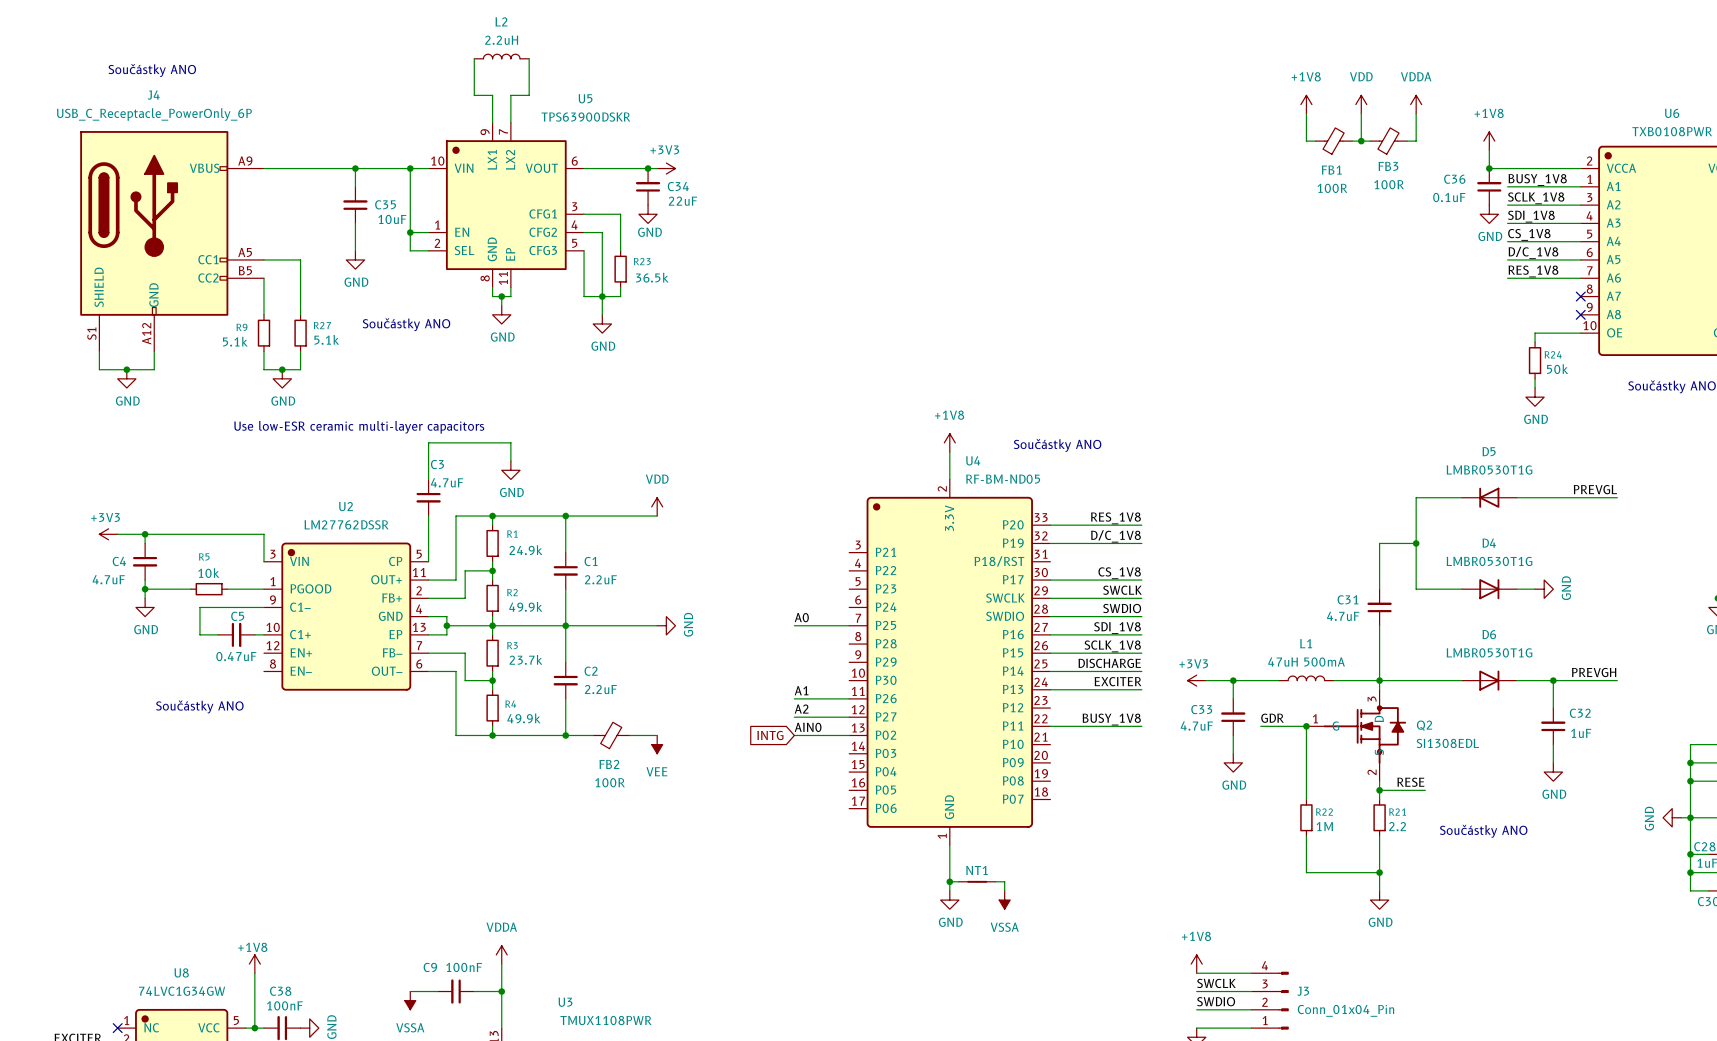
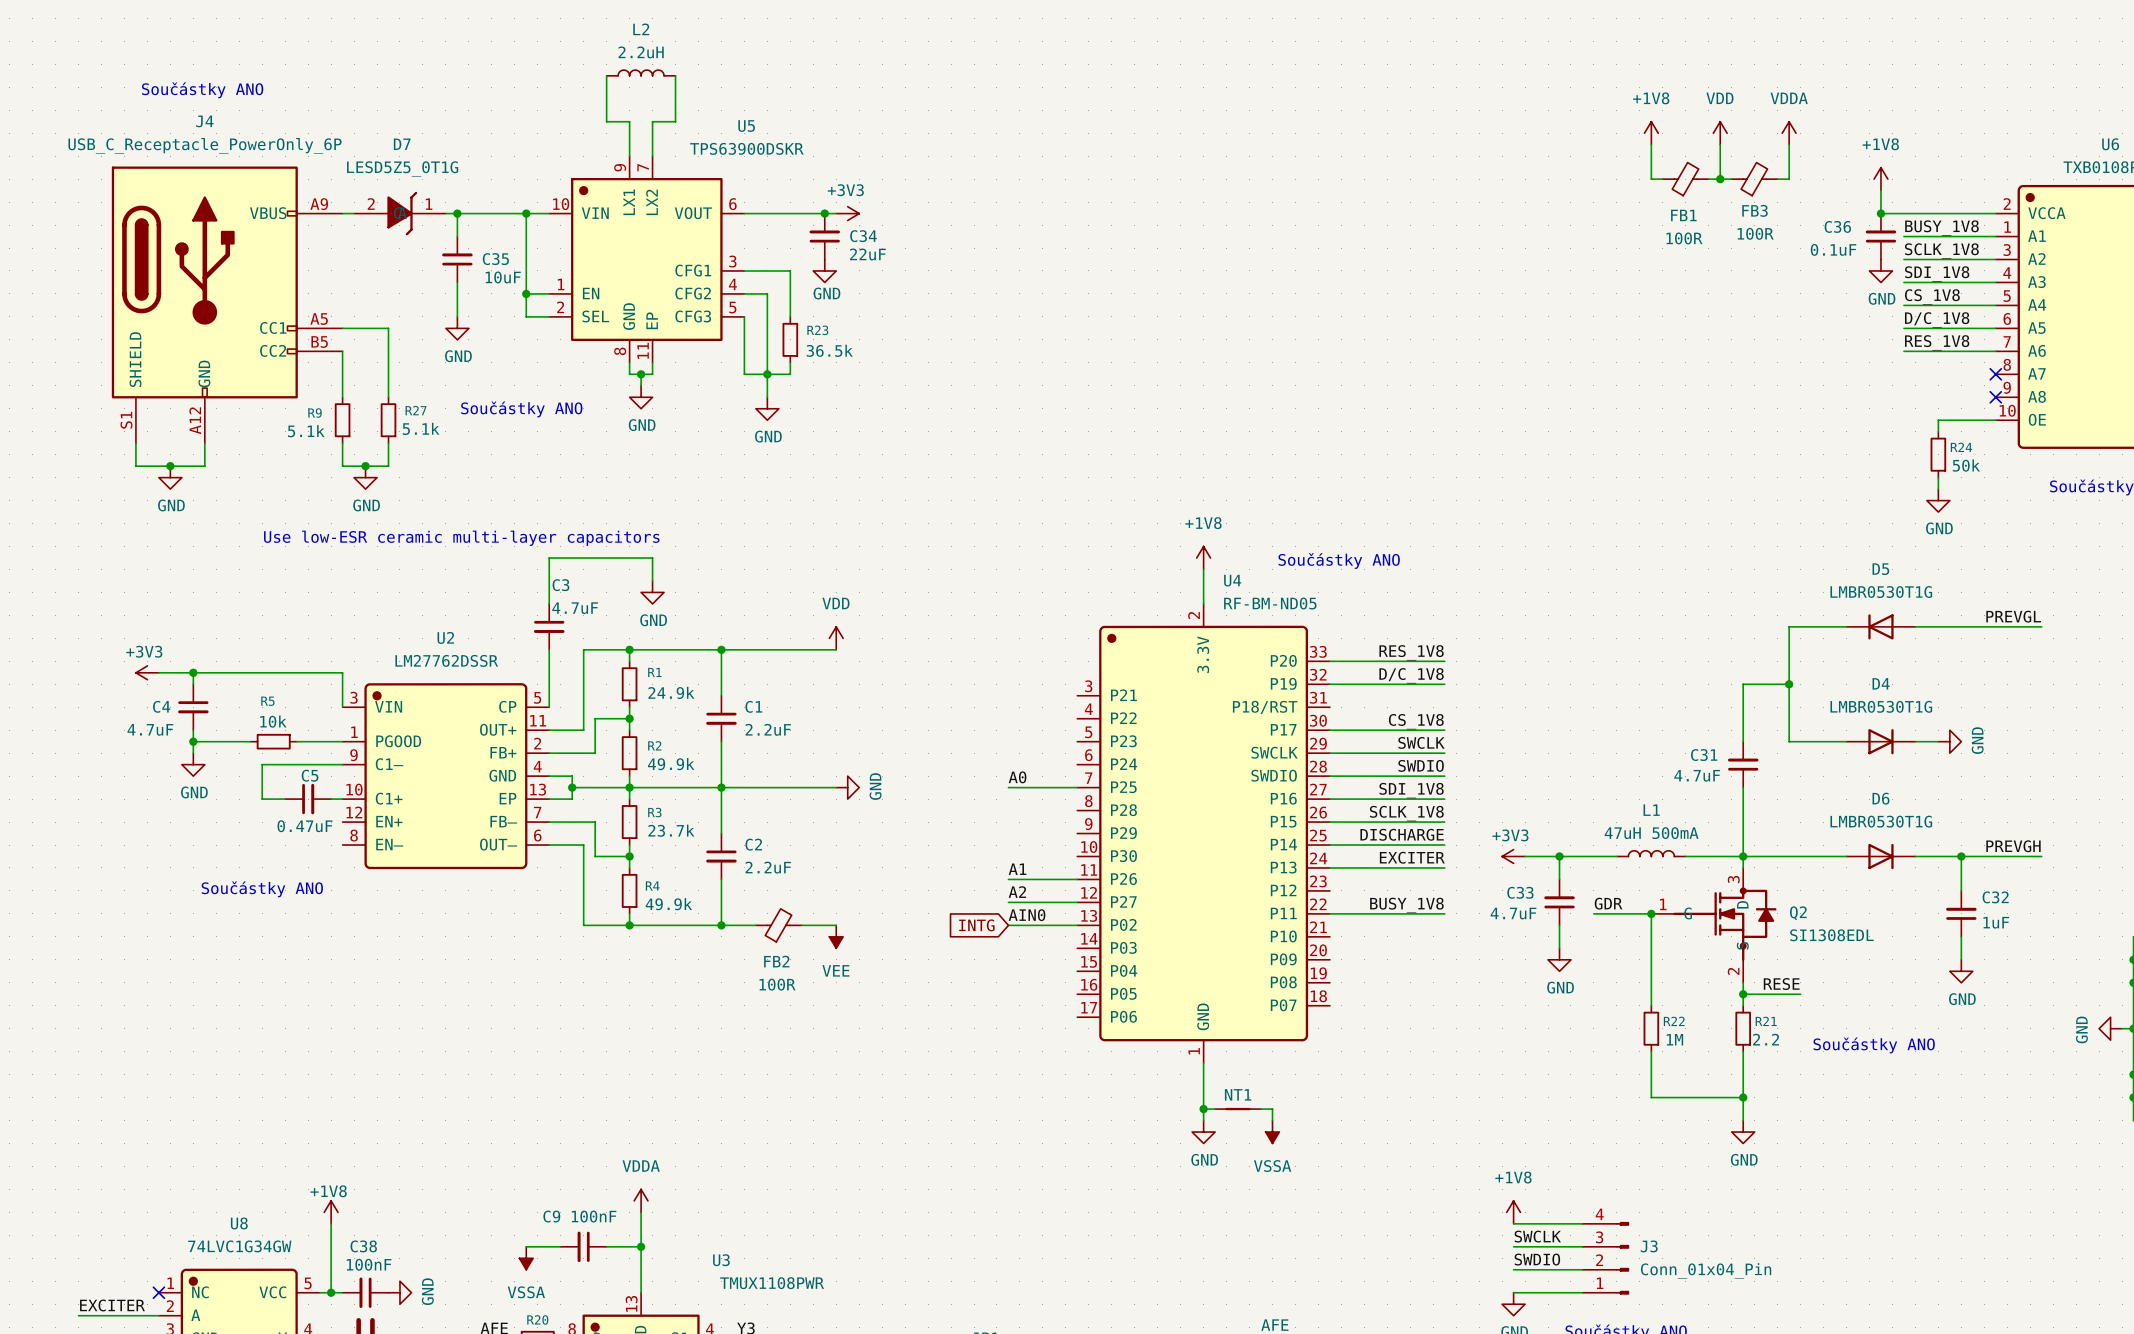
D7: none -> LESD5Z5_0T1G (399, 213)

